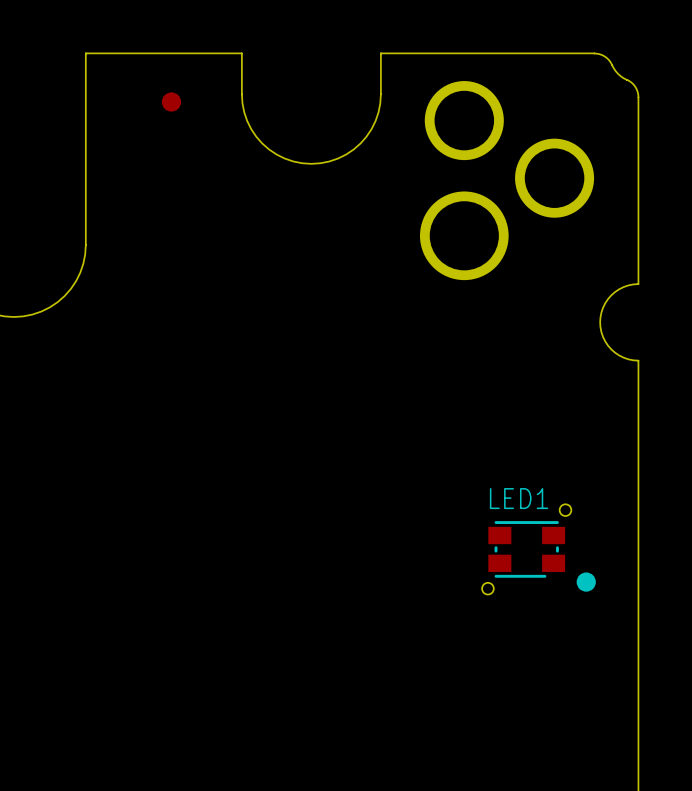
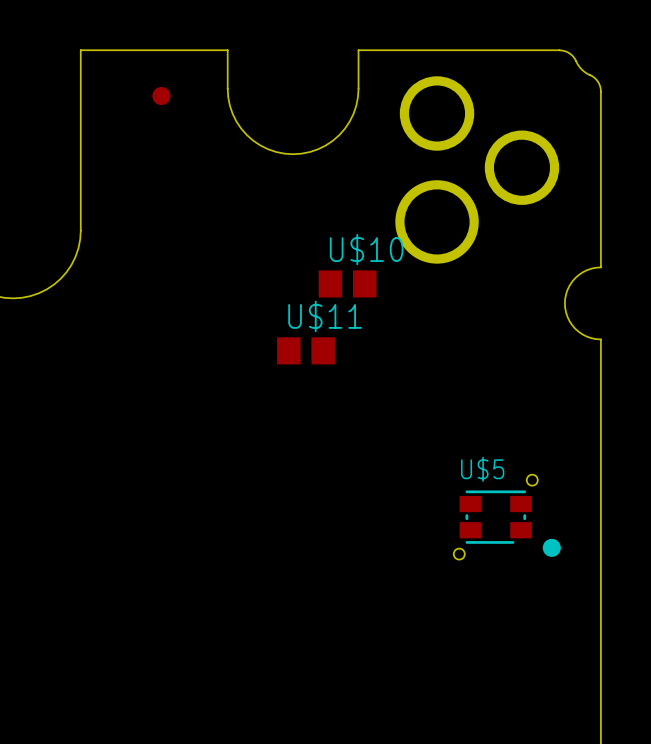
U$10: none -> (347, 283)
U$11: none -> (305, 350)
LED1 name: LED1 (519, 498) -> U$5 (482, 469)

